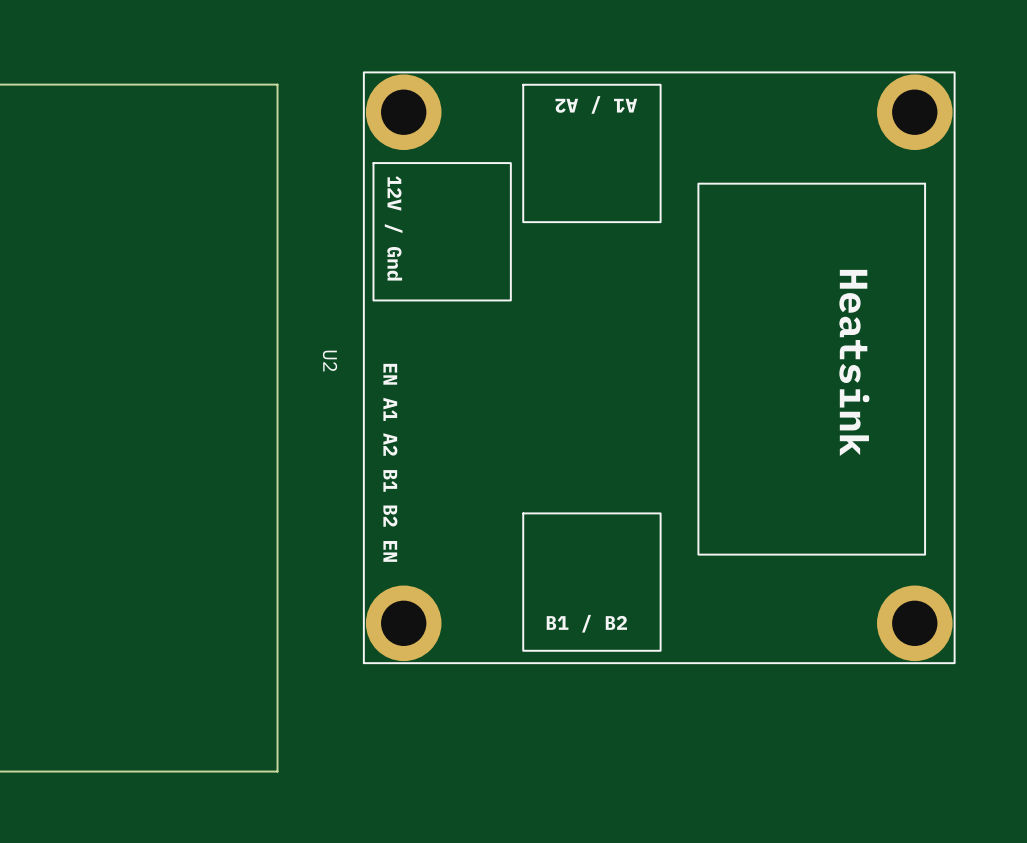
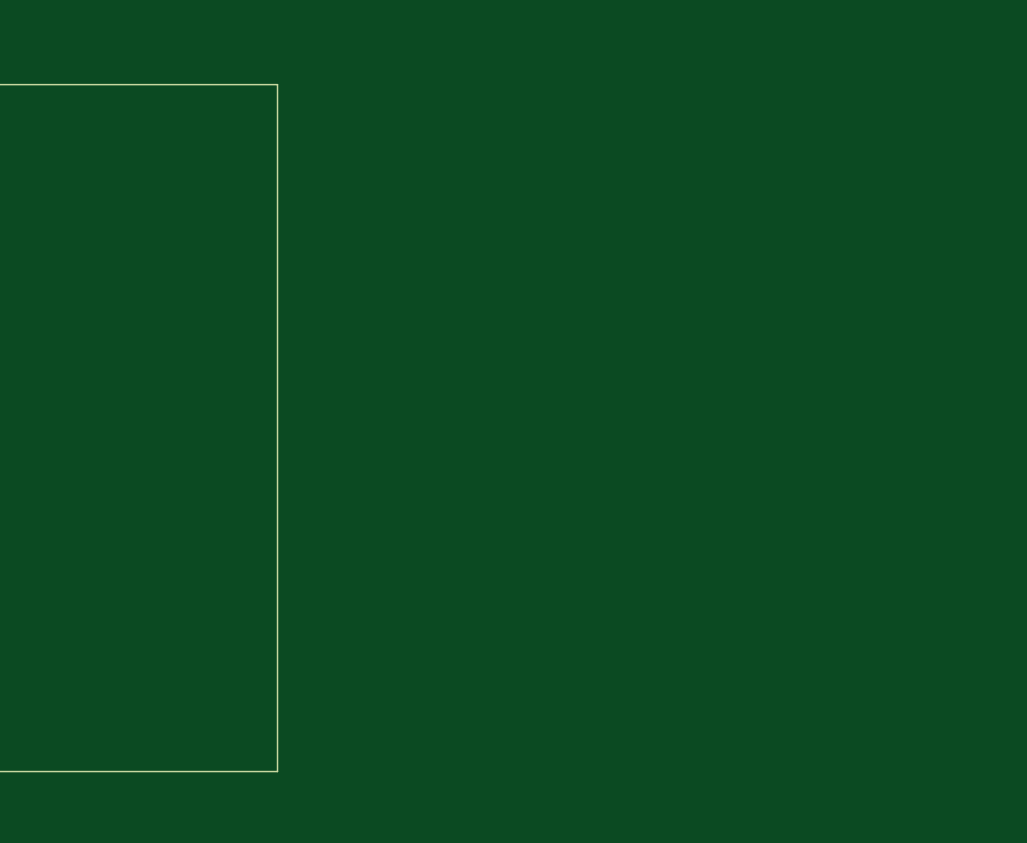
U2: (659, 367) -> none

